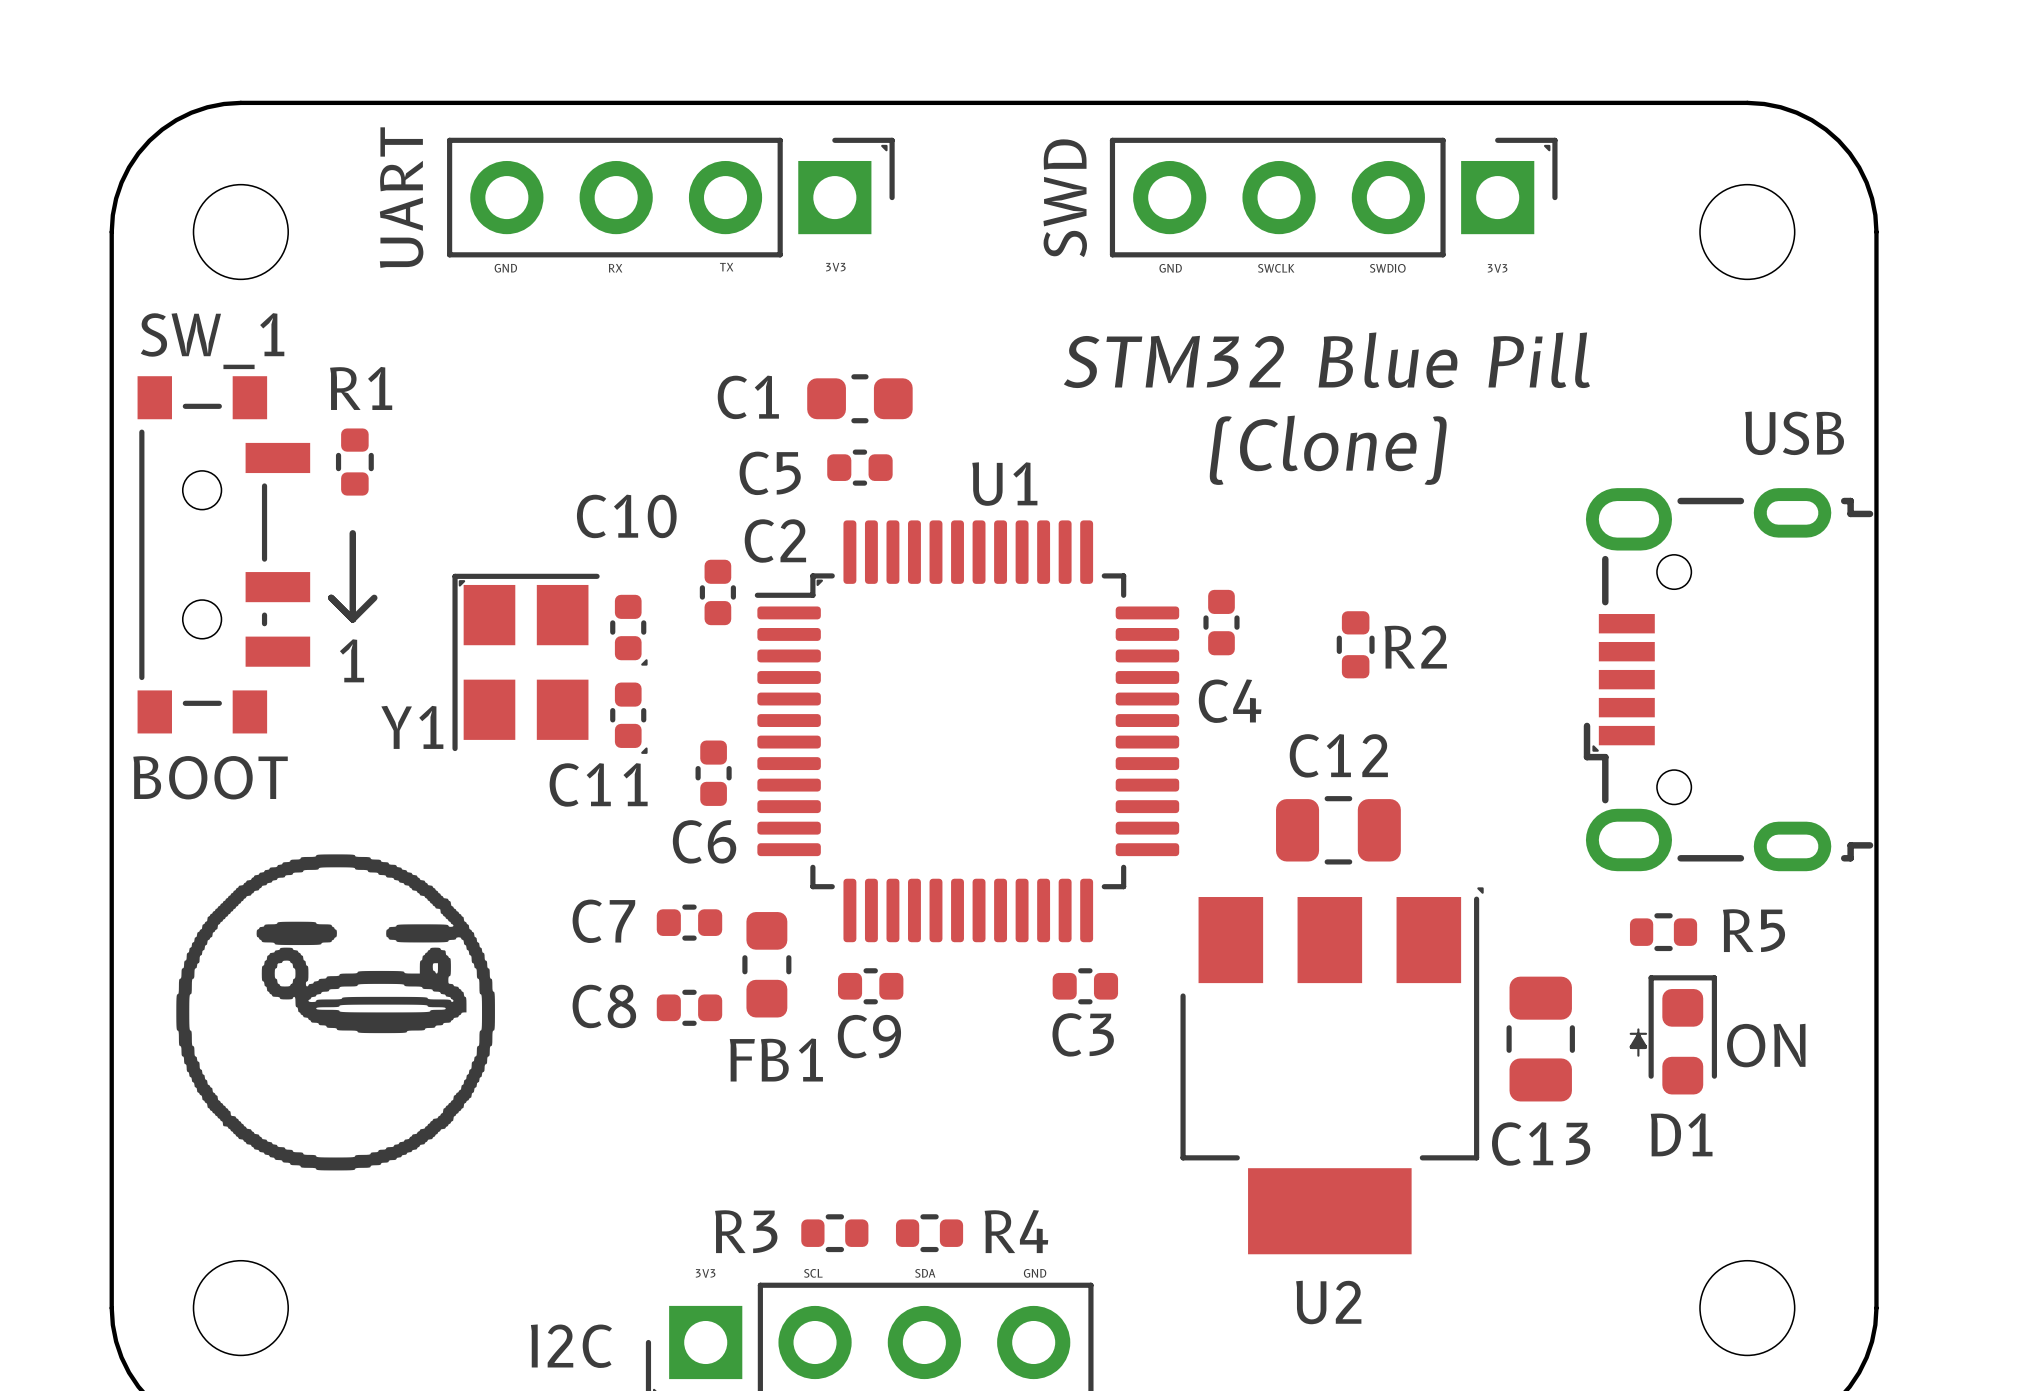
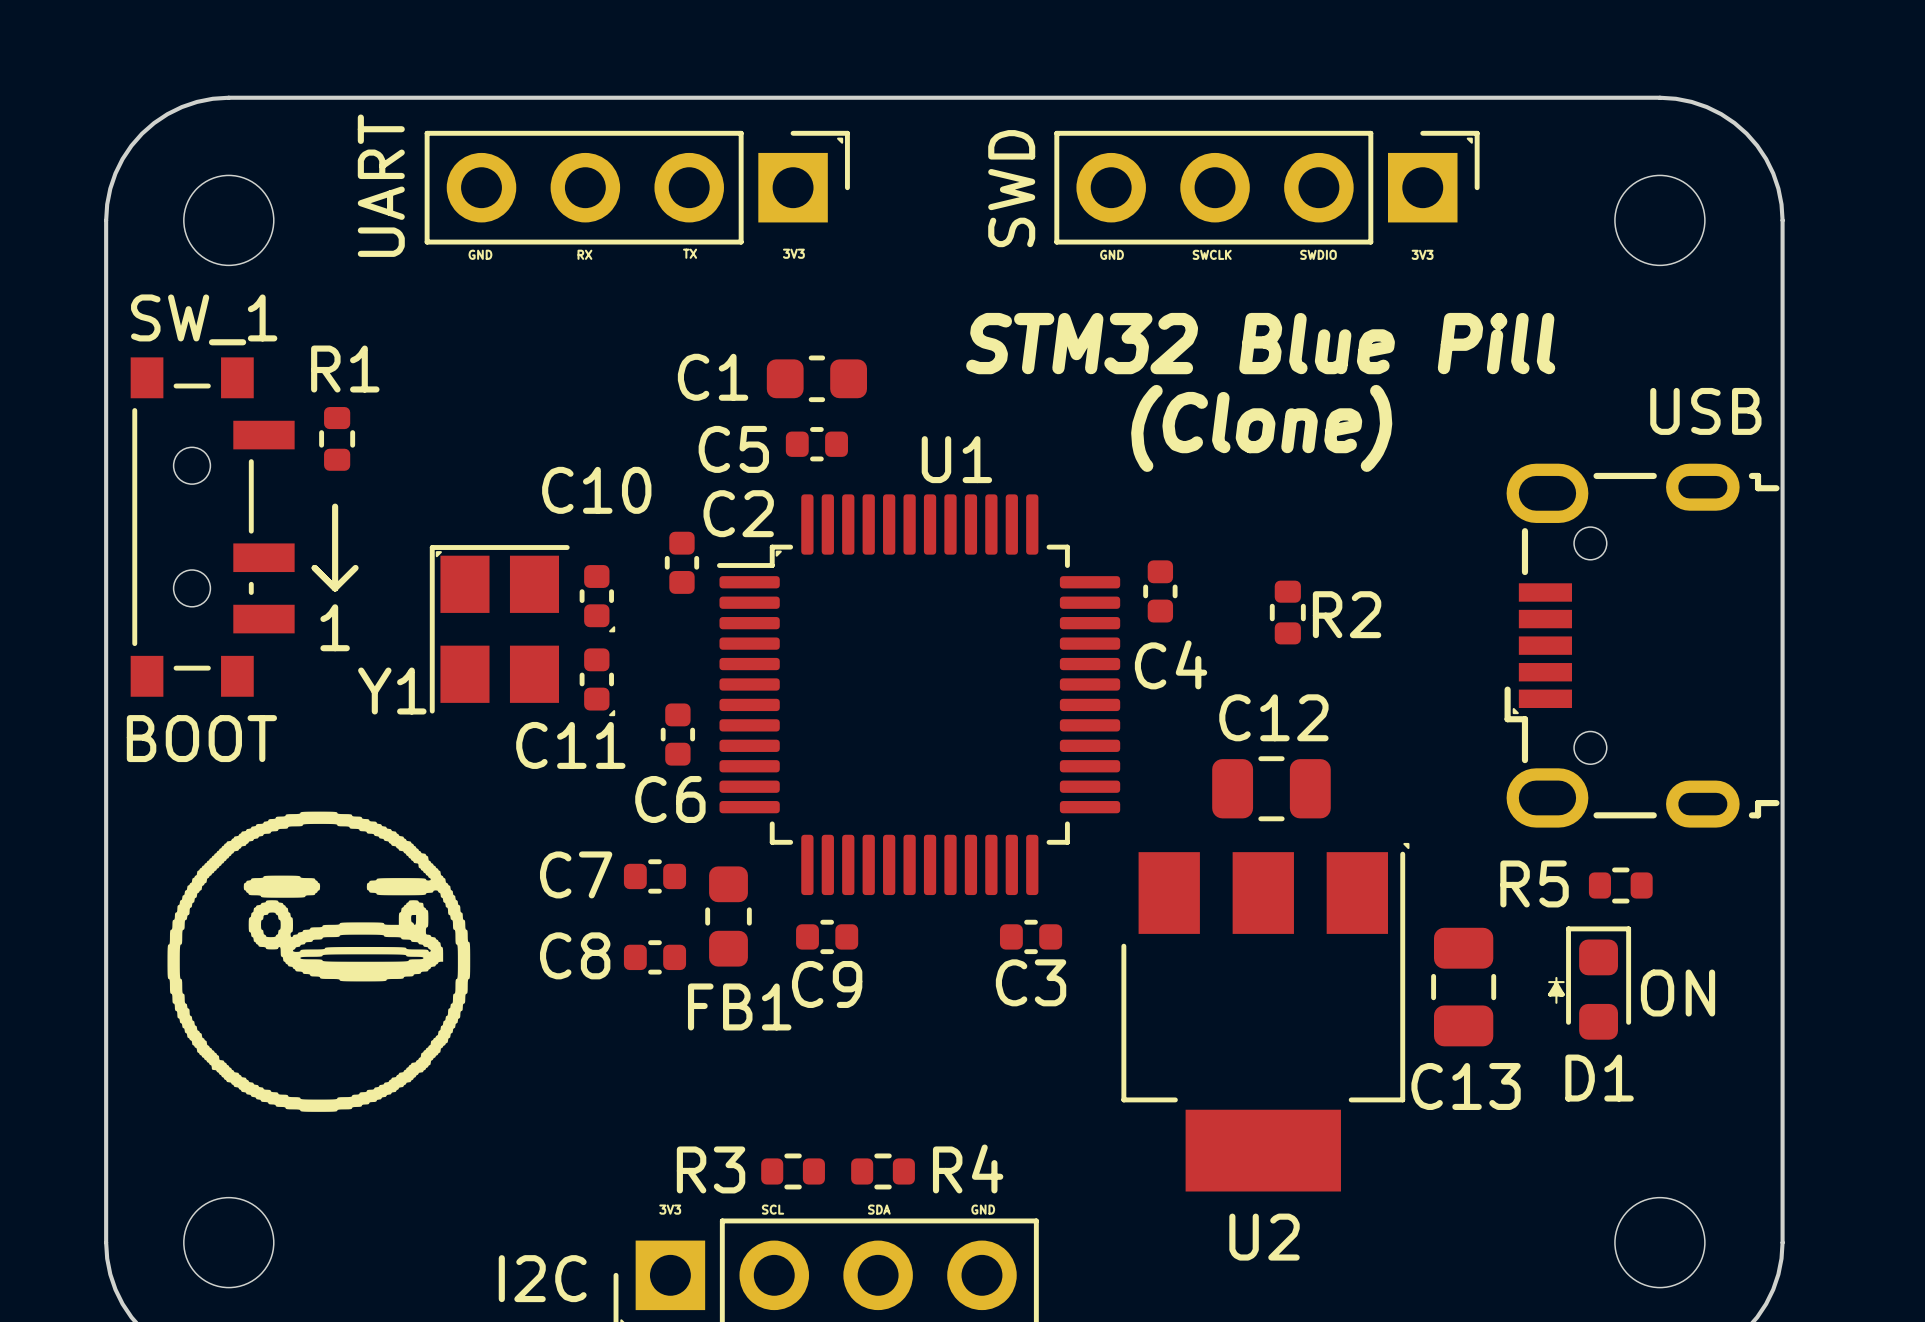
R5 name position: R5 (1754, 930) -> R5 (1534, 883)
R5 position: (1663, 932) -> (1620, 885)

